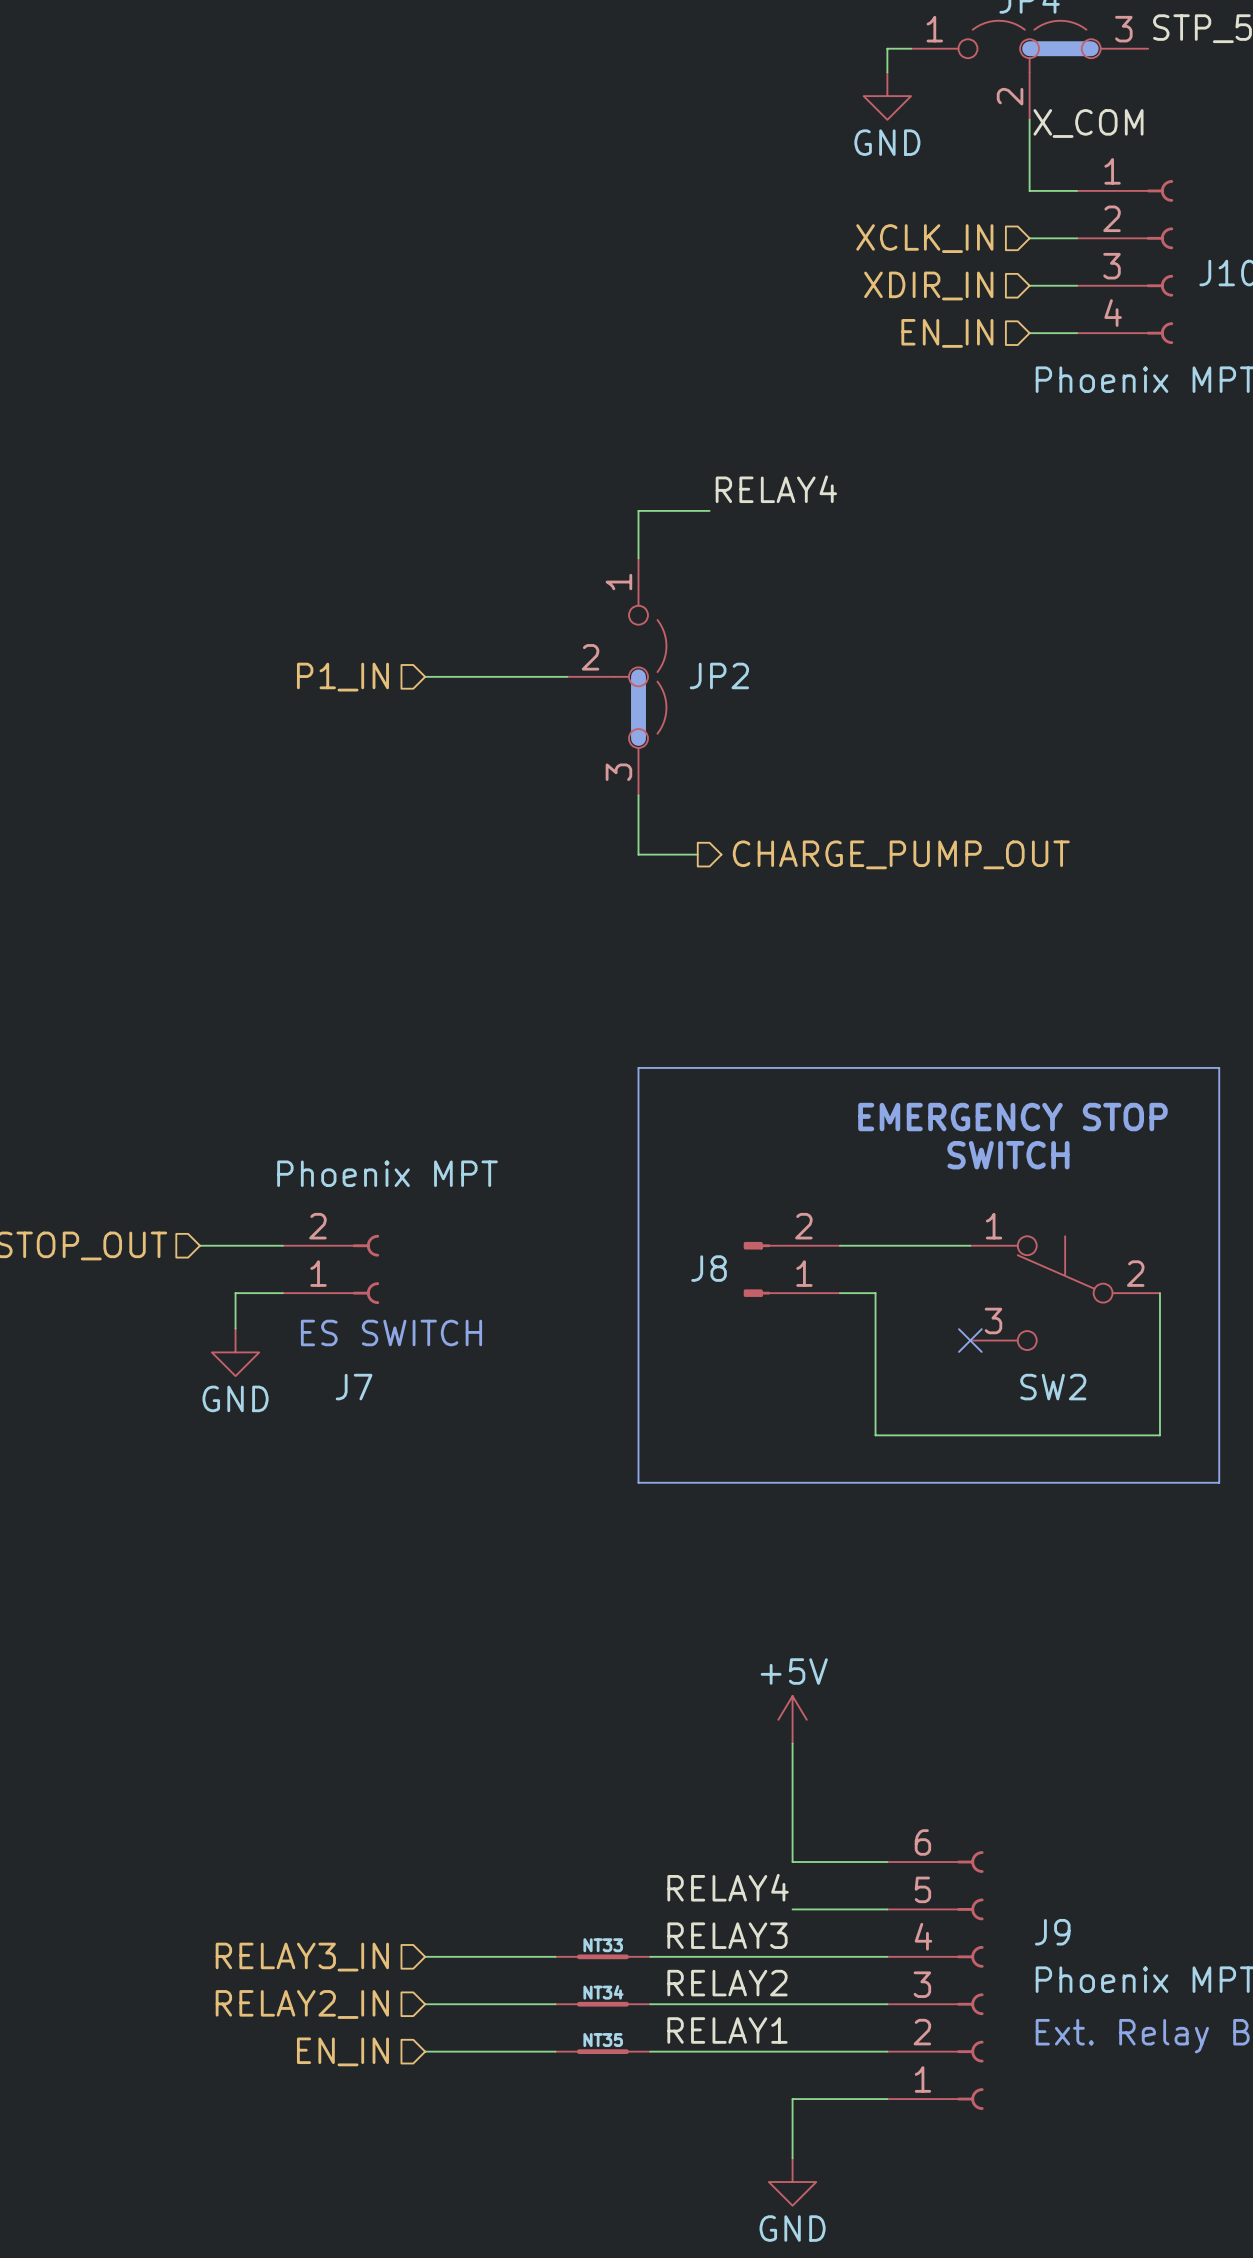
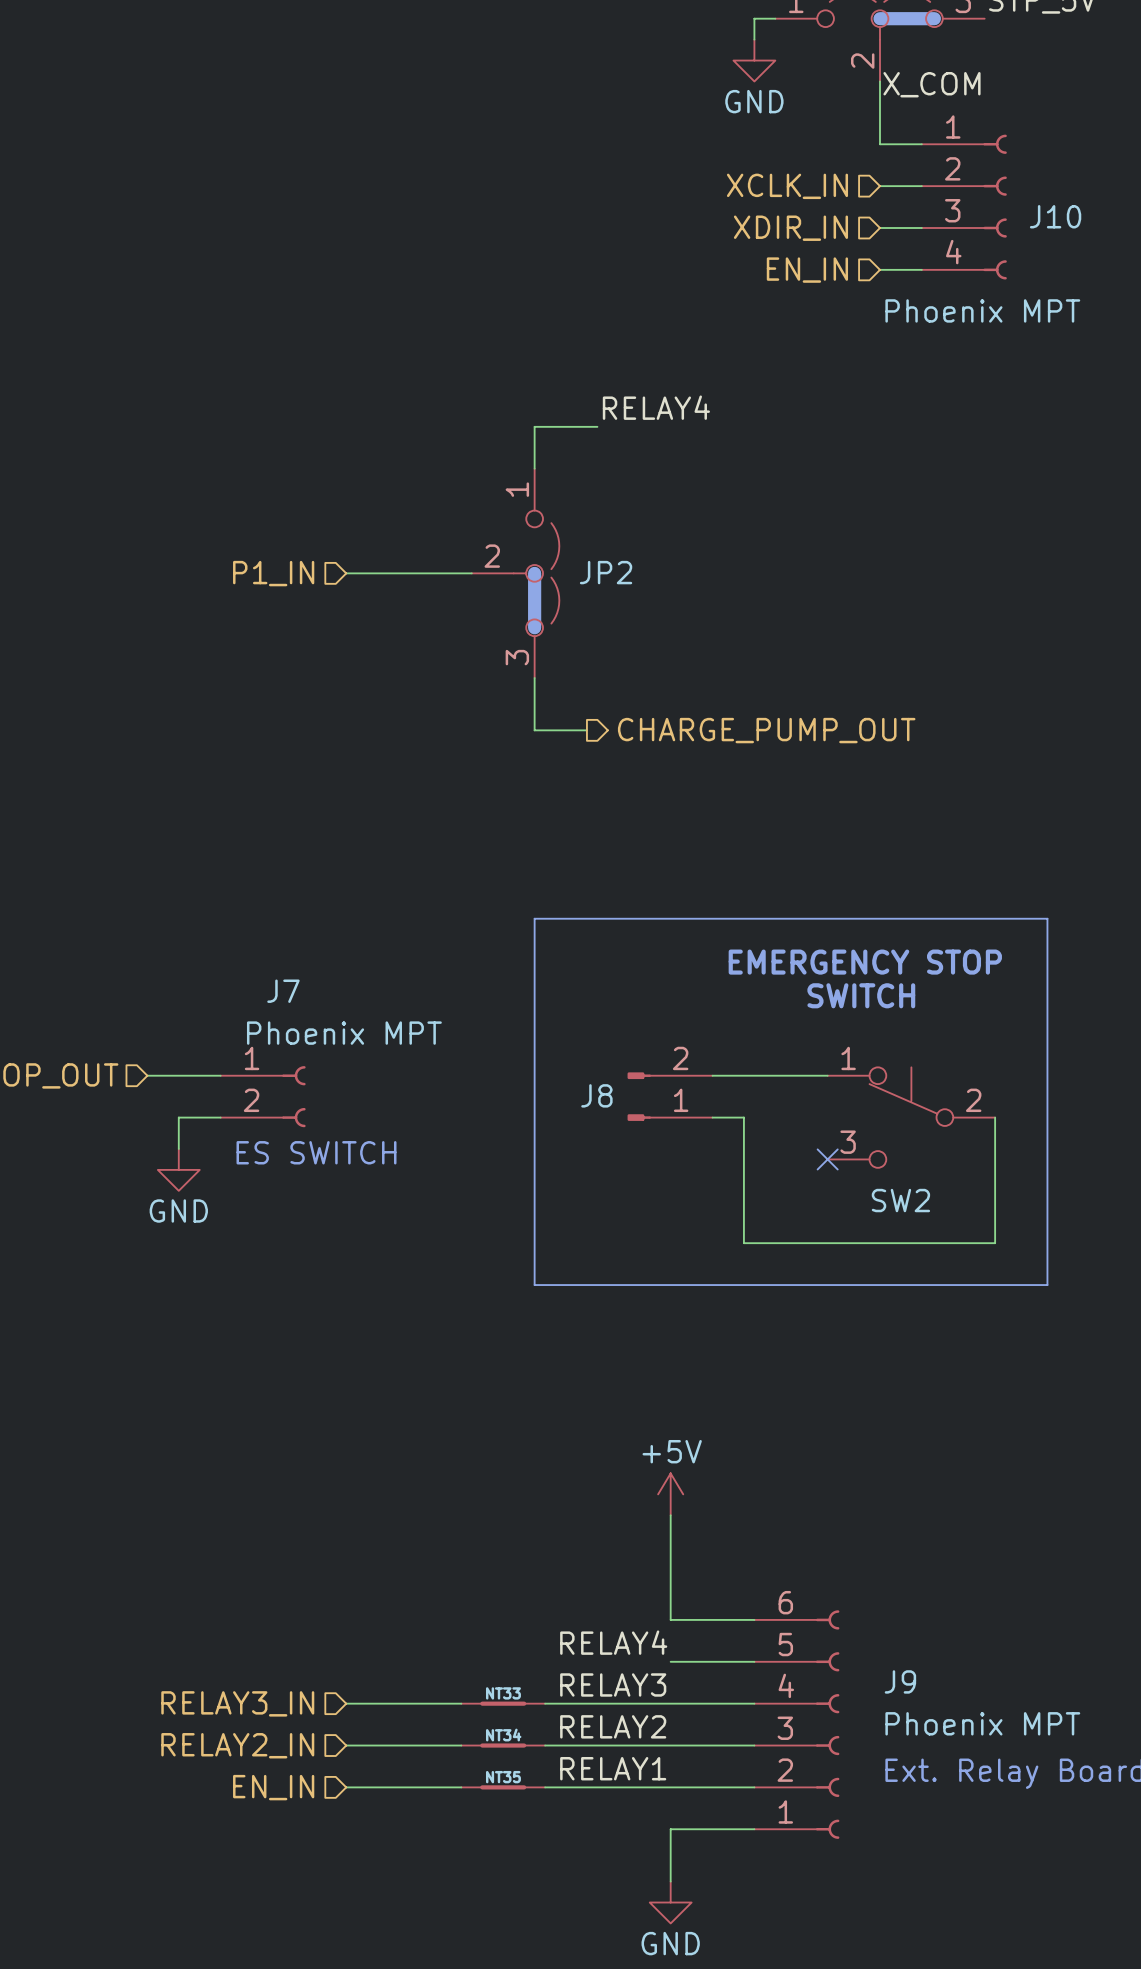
J7 value position: Phoenix MPT (387, 1173) -> Phoenix MPT (344, 1033)
J7 flip: as is (365, 1269) -> up-down (293, 1096)

